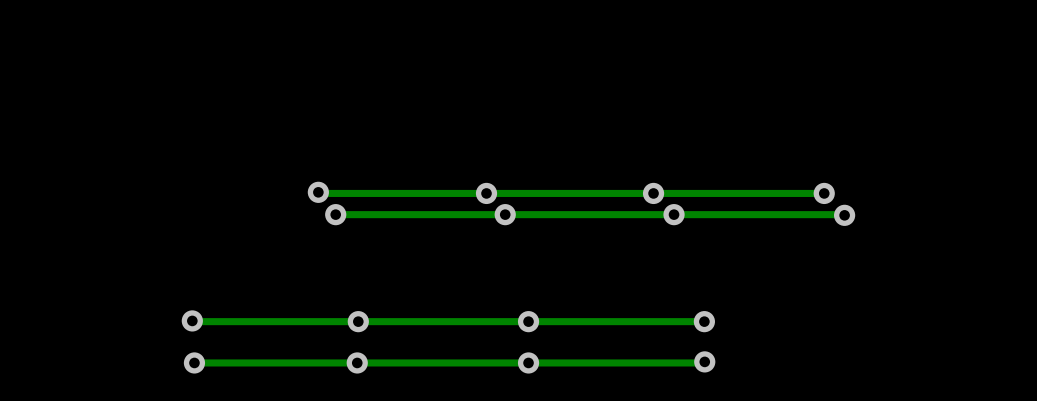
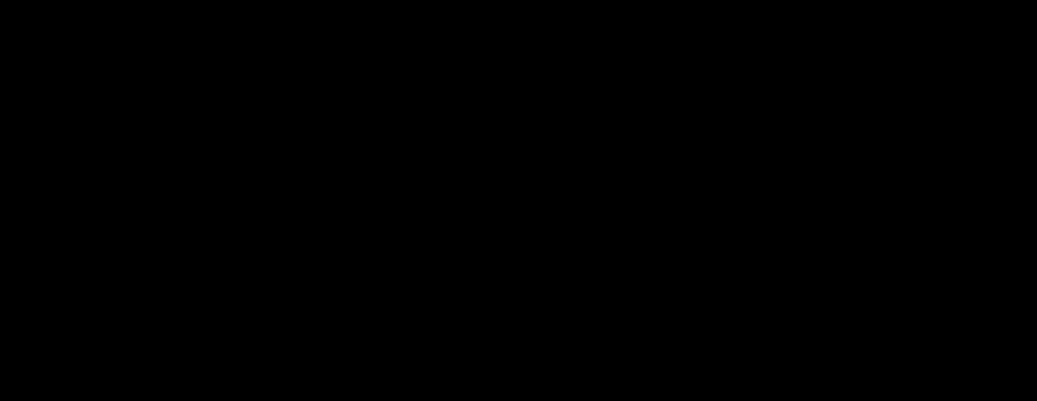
track: (318, 192) (824, 193) -> none
via: (318, 192) -> none
via: (486, 193) -> none
via: (653, 193) -> none
via: (824, 193) -> none
track: (335, 214) (844, 215) -> none
via: (335, 214) -> none
via: (505, 214) -> none
via: (674, 214) -> none
via: (844, 215) -> none
track: (192, 320) (704, 321) -> none
via: (192, 320) -> none
via: (358, 321) -> none
via: (528, 321) -> none
via: (704, 321) -> none
track: (704, 361) (194, 362) -> none
via: (704, 361) -> none
via: (194, 362) -> none
via: (357, 362) -> none
via: (528, 362) -> none

